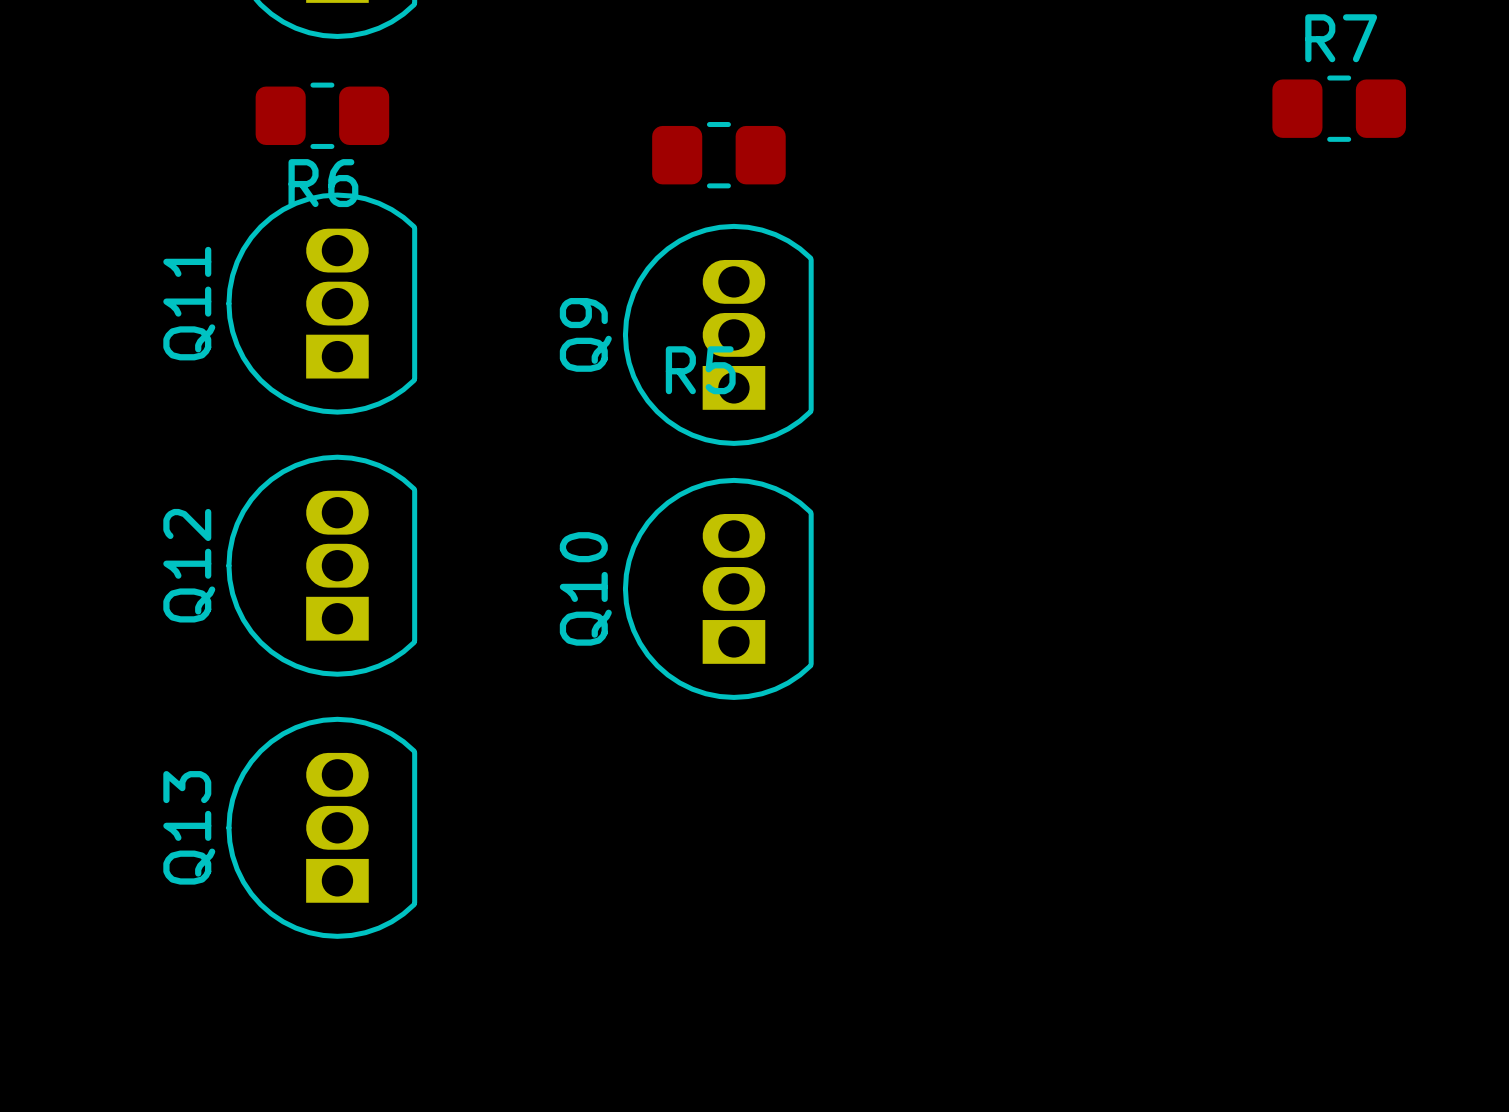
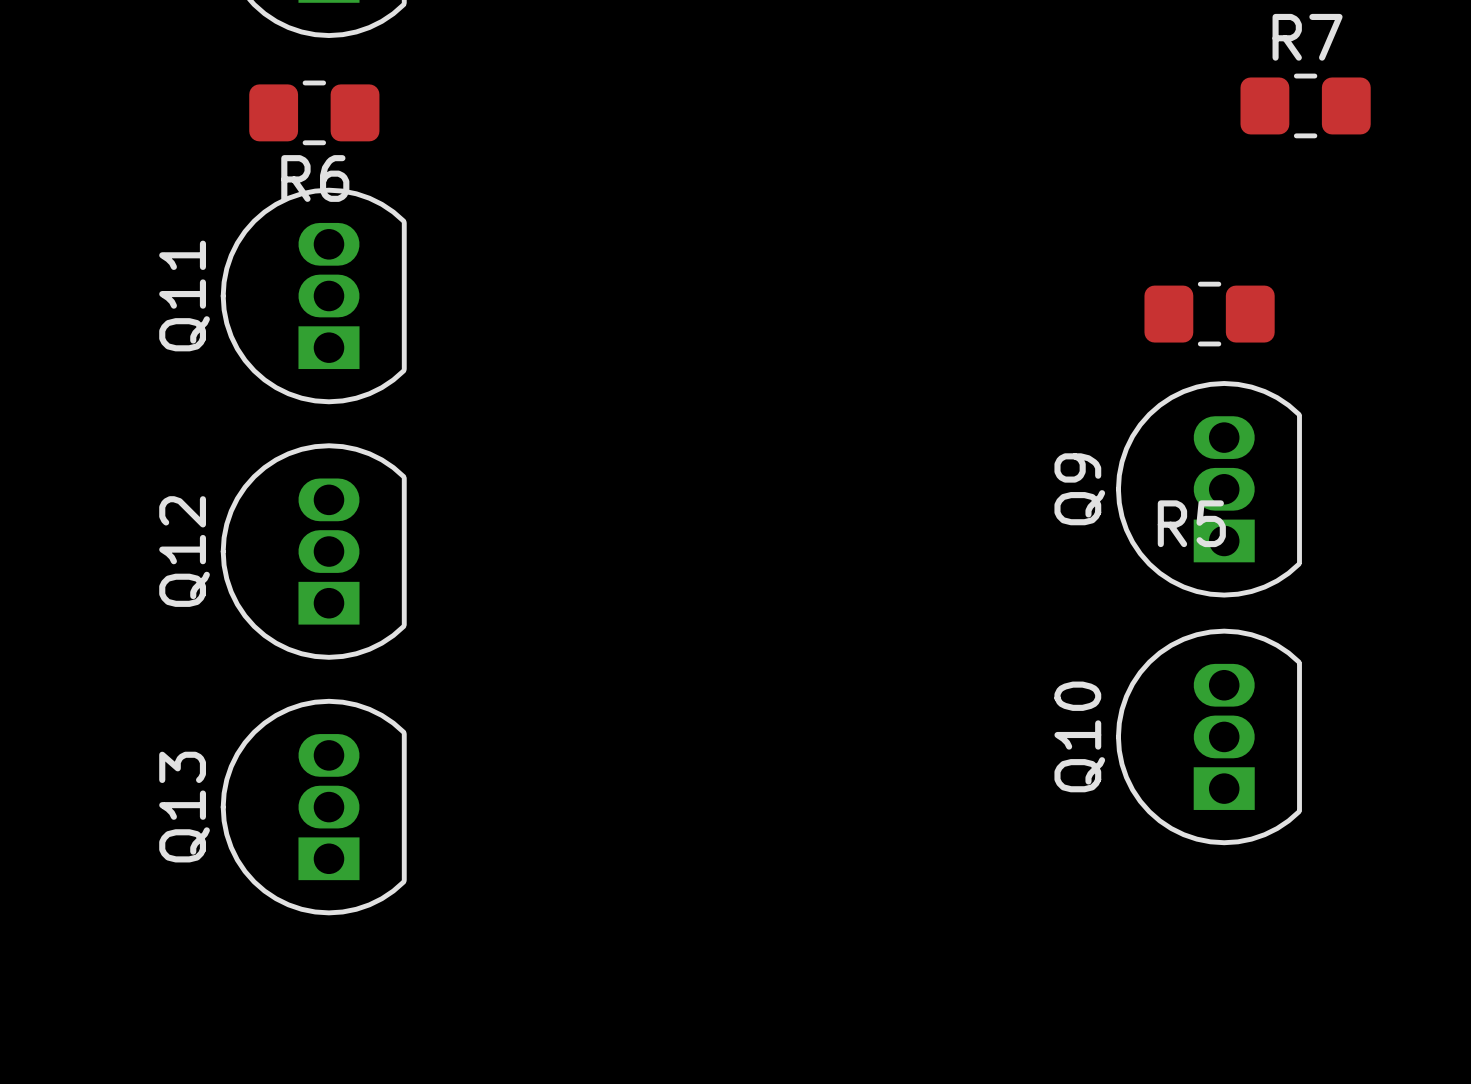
R5 position: (718, 155) -> (1209, 314)
Q9 position: (718, 334) -> (1208, 489)
Q10 position: (718, 588) -> (1208, 736)

